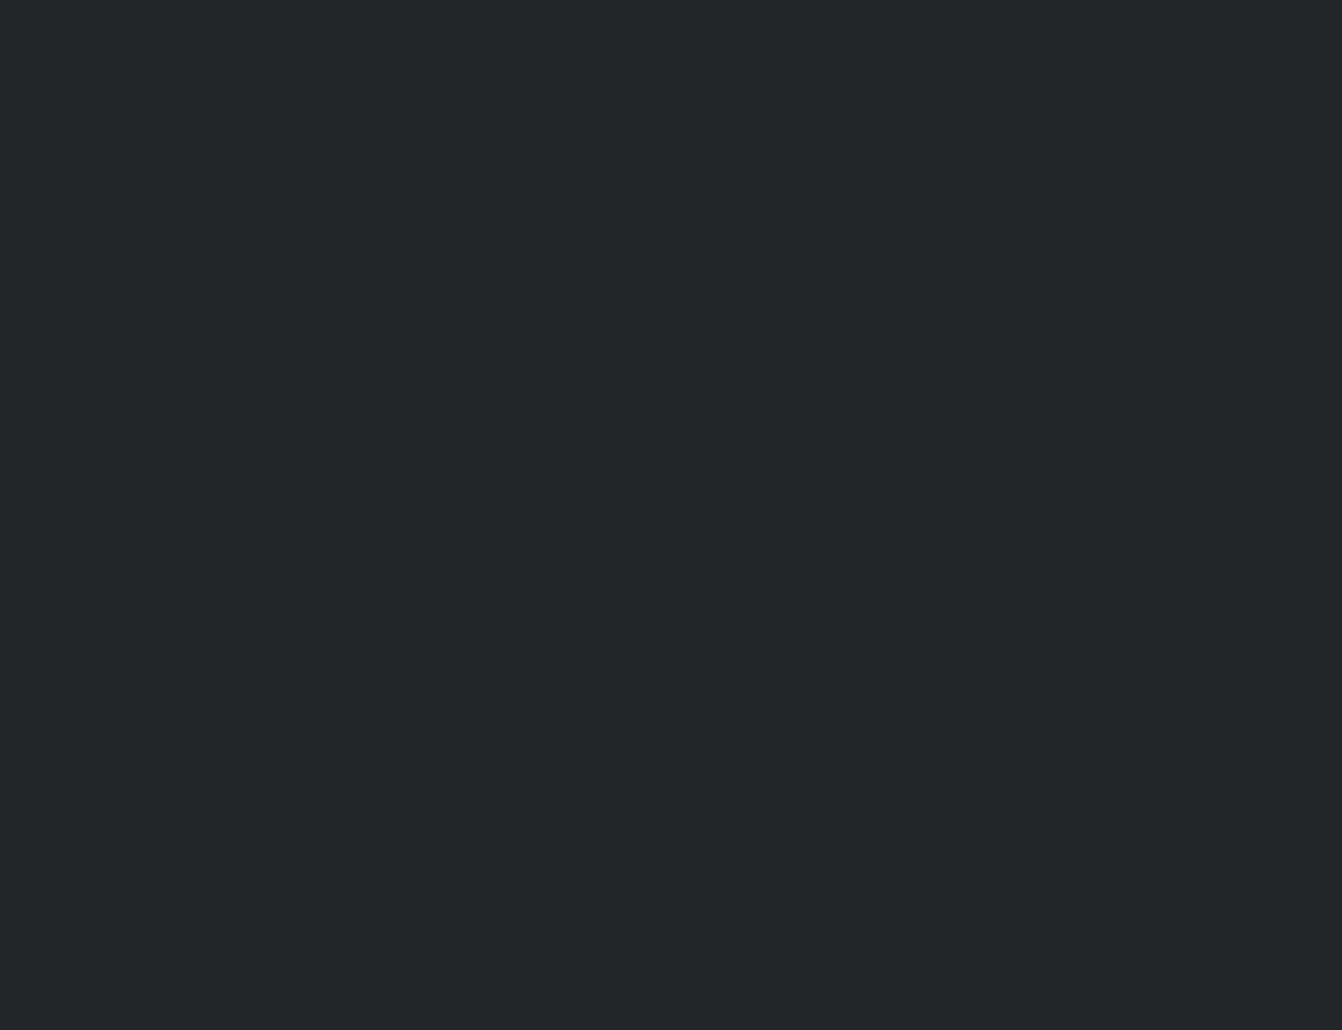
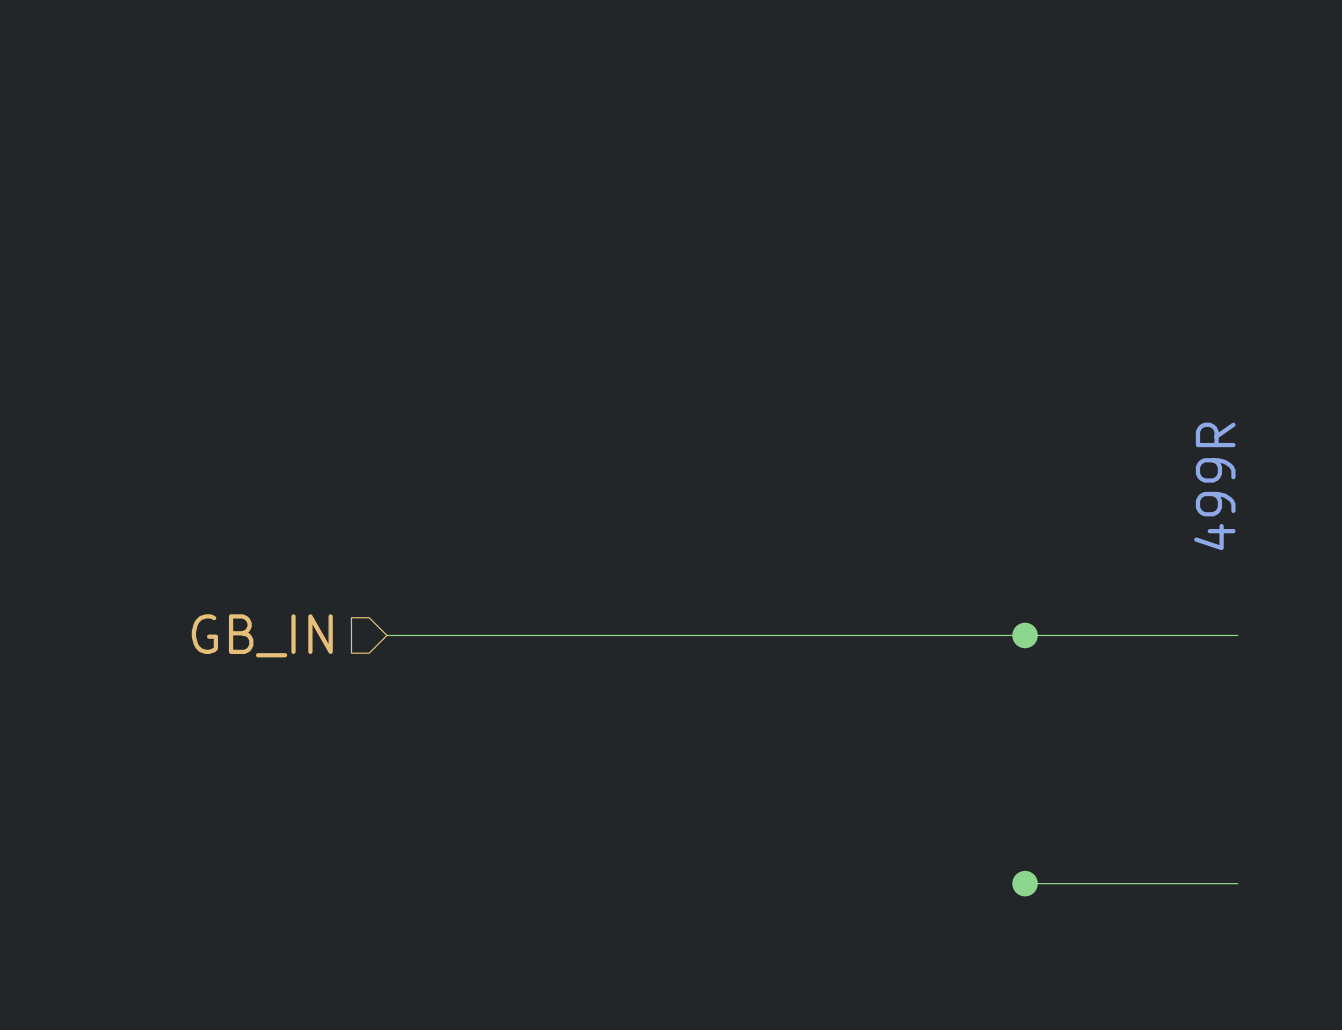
text: none -> 499R (1214, 486)
hierarchical label: none -> GB_IN (262, 635)
wire: none -> (386, 635) (1237, 635)
junction: none -> (1025, 635)
wire: none -> (1025, 883) (1237, 883)
junction: none -> (1025, 883)

